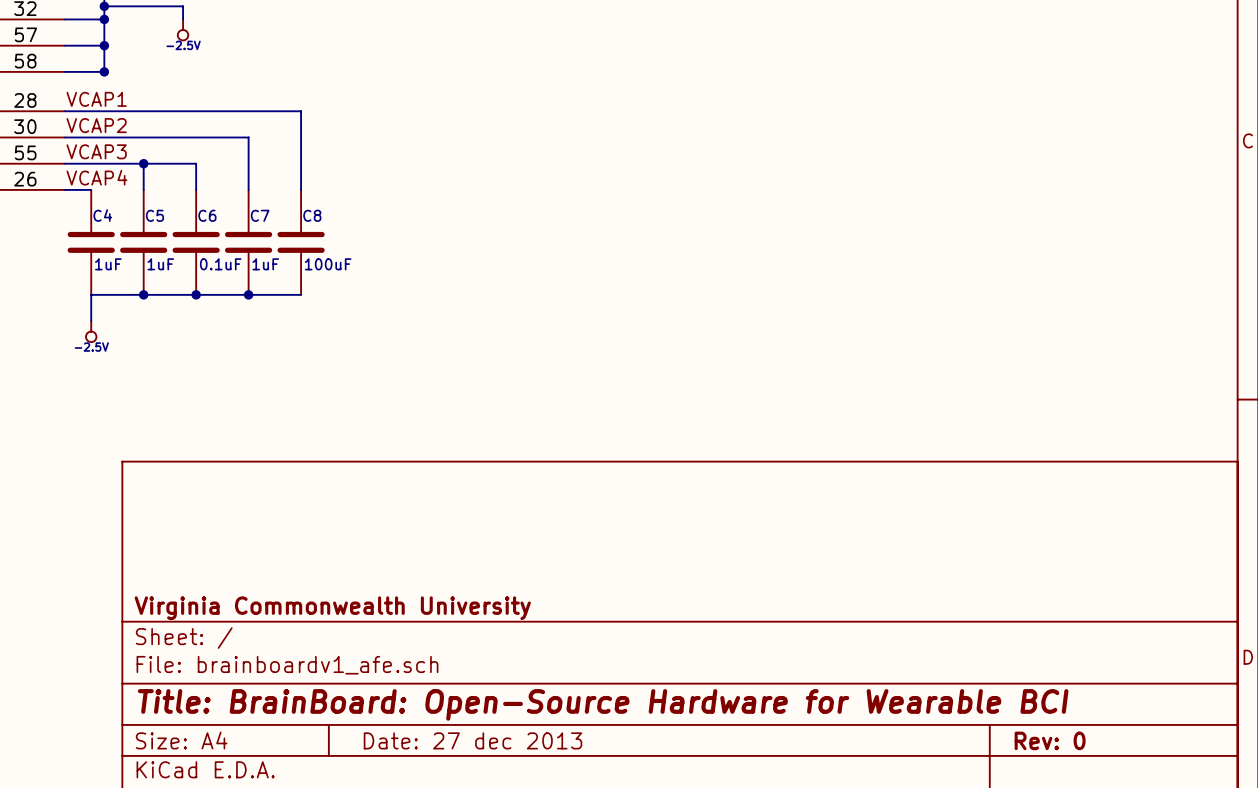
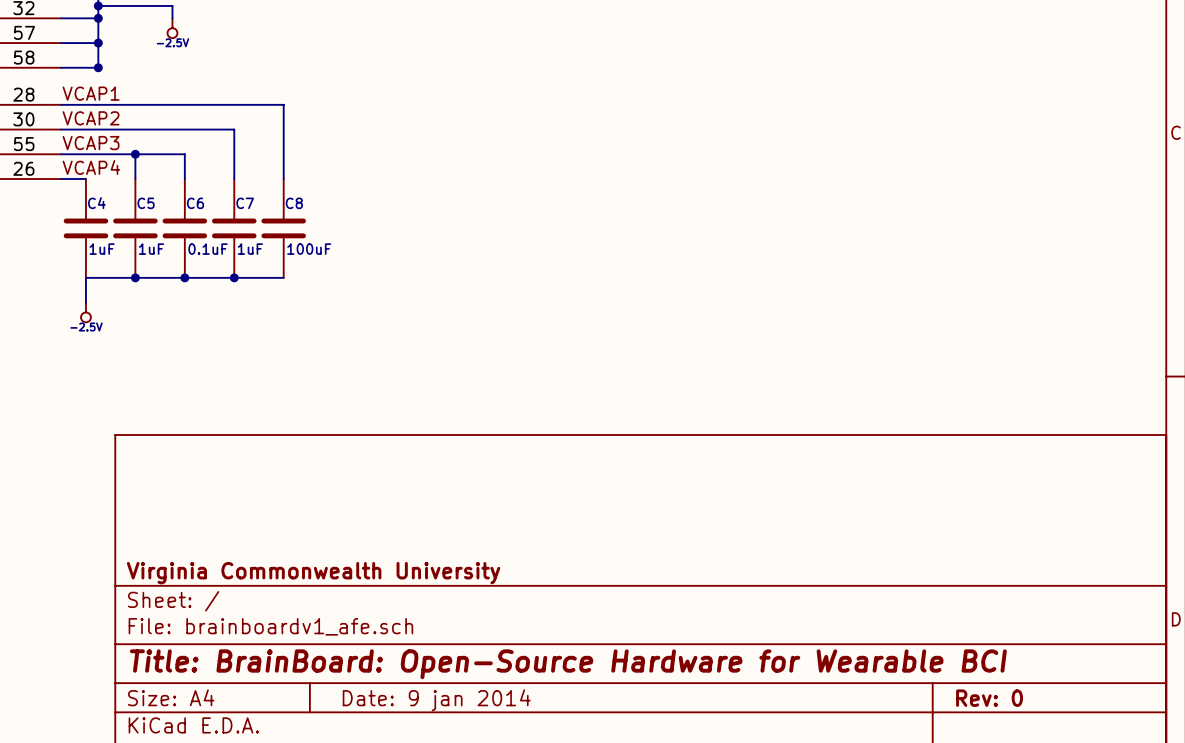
title block: Date: 27 dec 2013 (473, 740) -> Date: 9 jan 2014 (436, 700)

